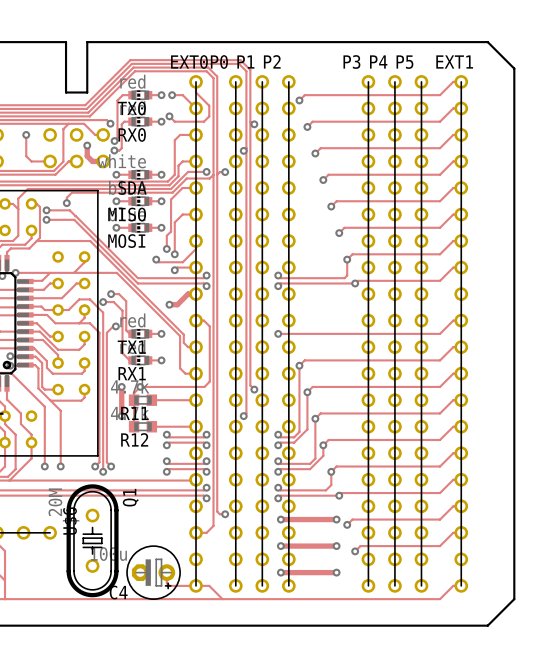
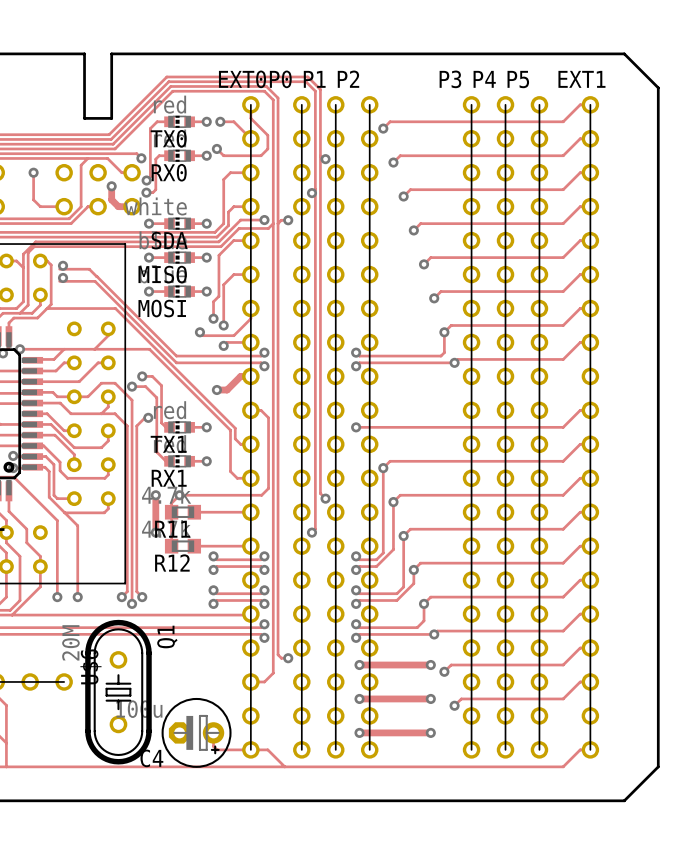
track: (71, 192) (66, 197) (66, 203) -> (92, 246) (34, 246) (28, 252) (28, 305) (20, 313)
via: (66, 203) -> none
via: none -> (63, 265)
via: (46, 210) -> none
via: none -> (63, 277)
via: (46, 219) -> none

